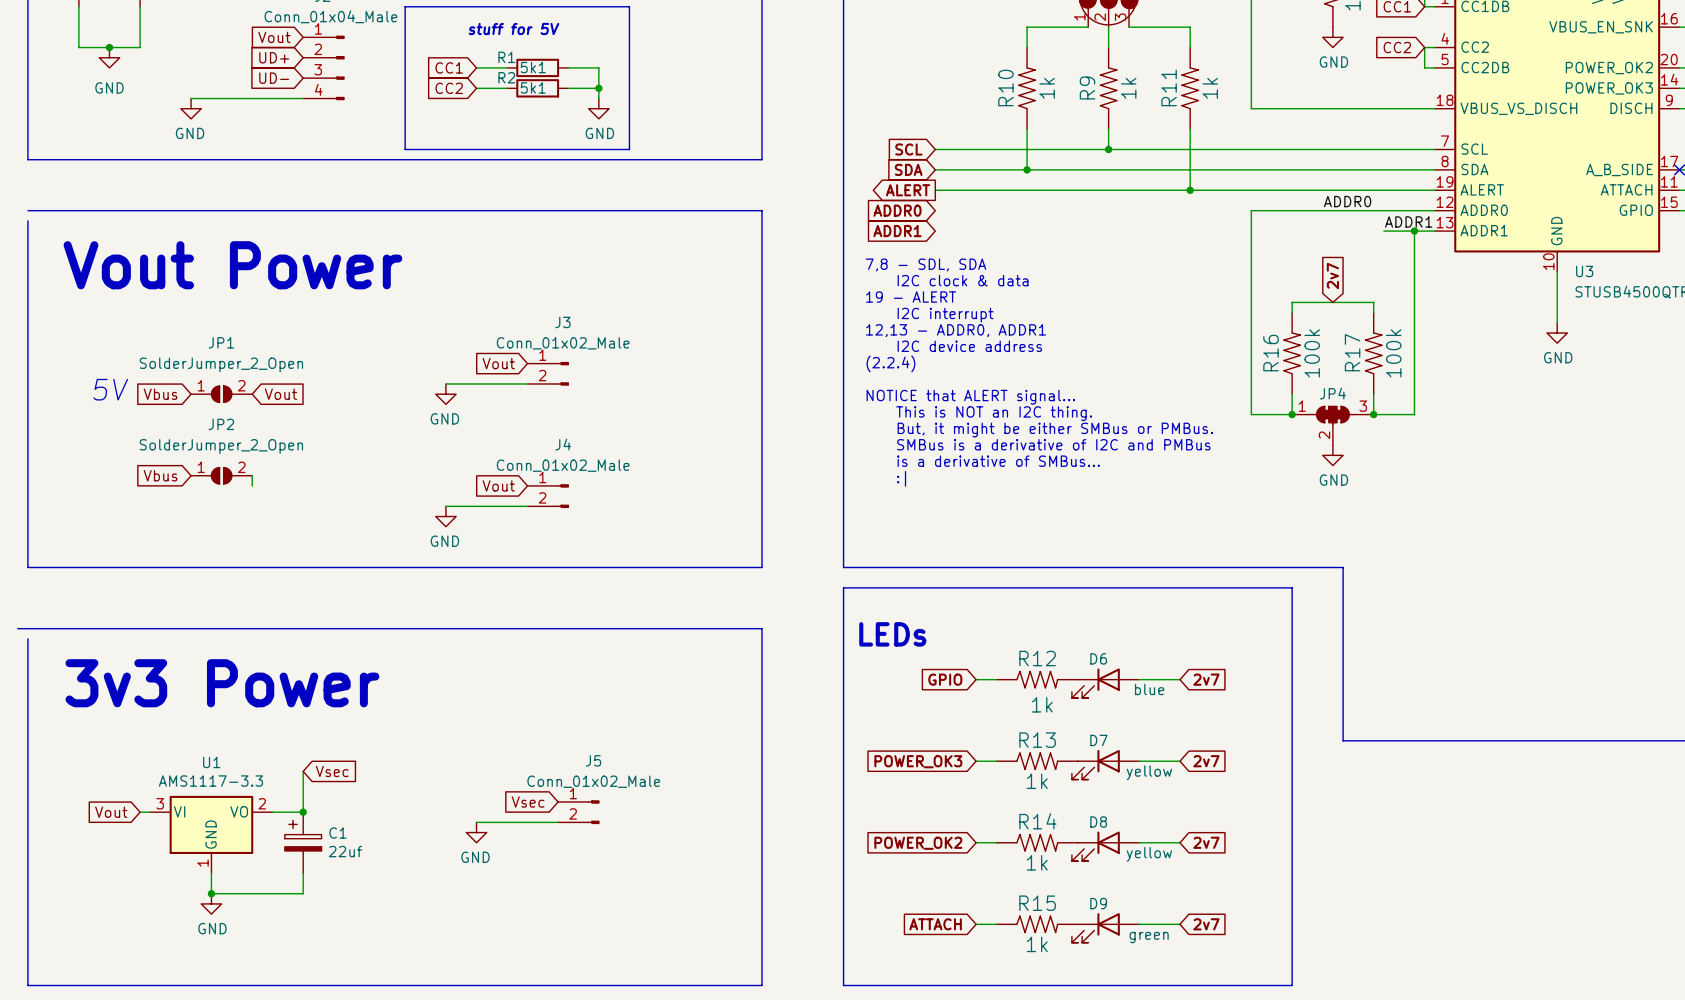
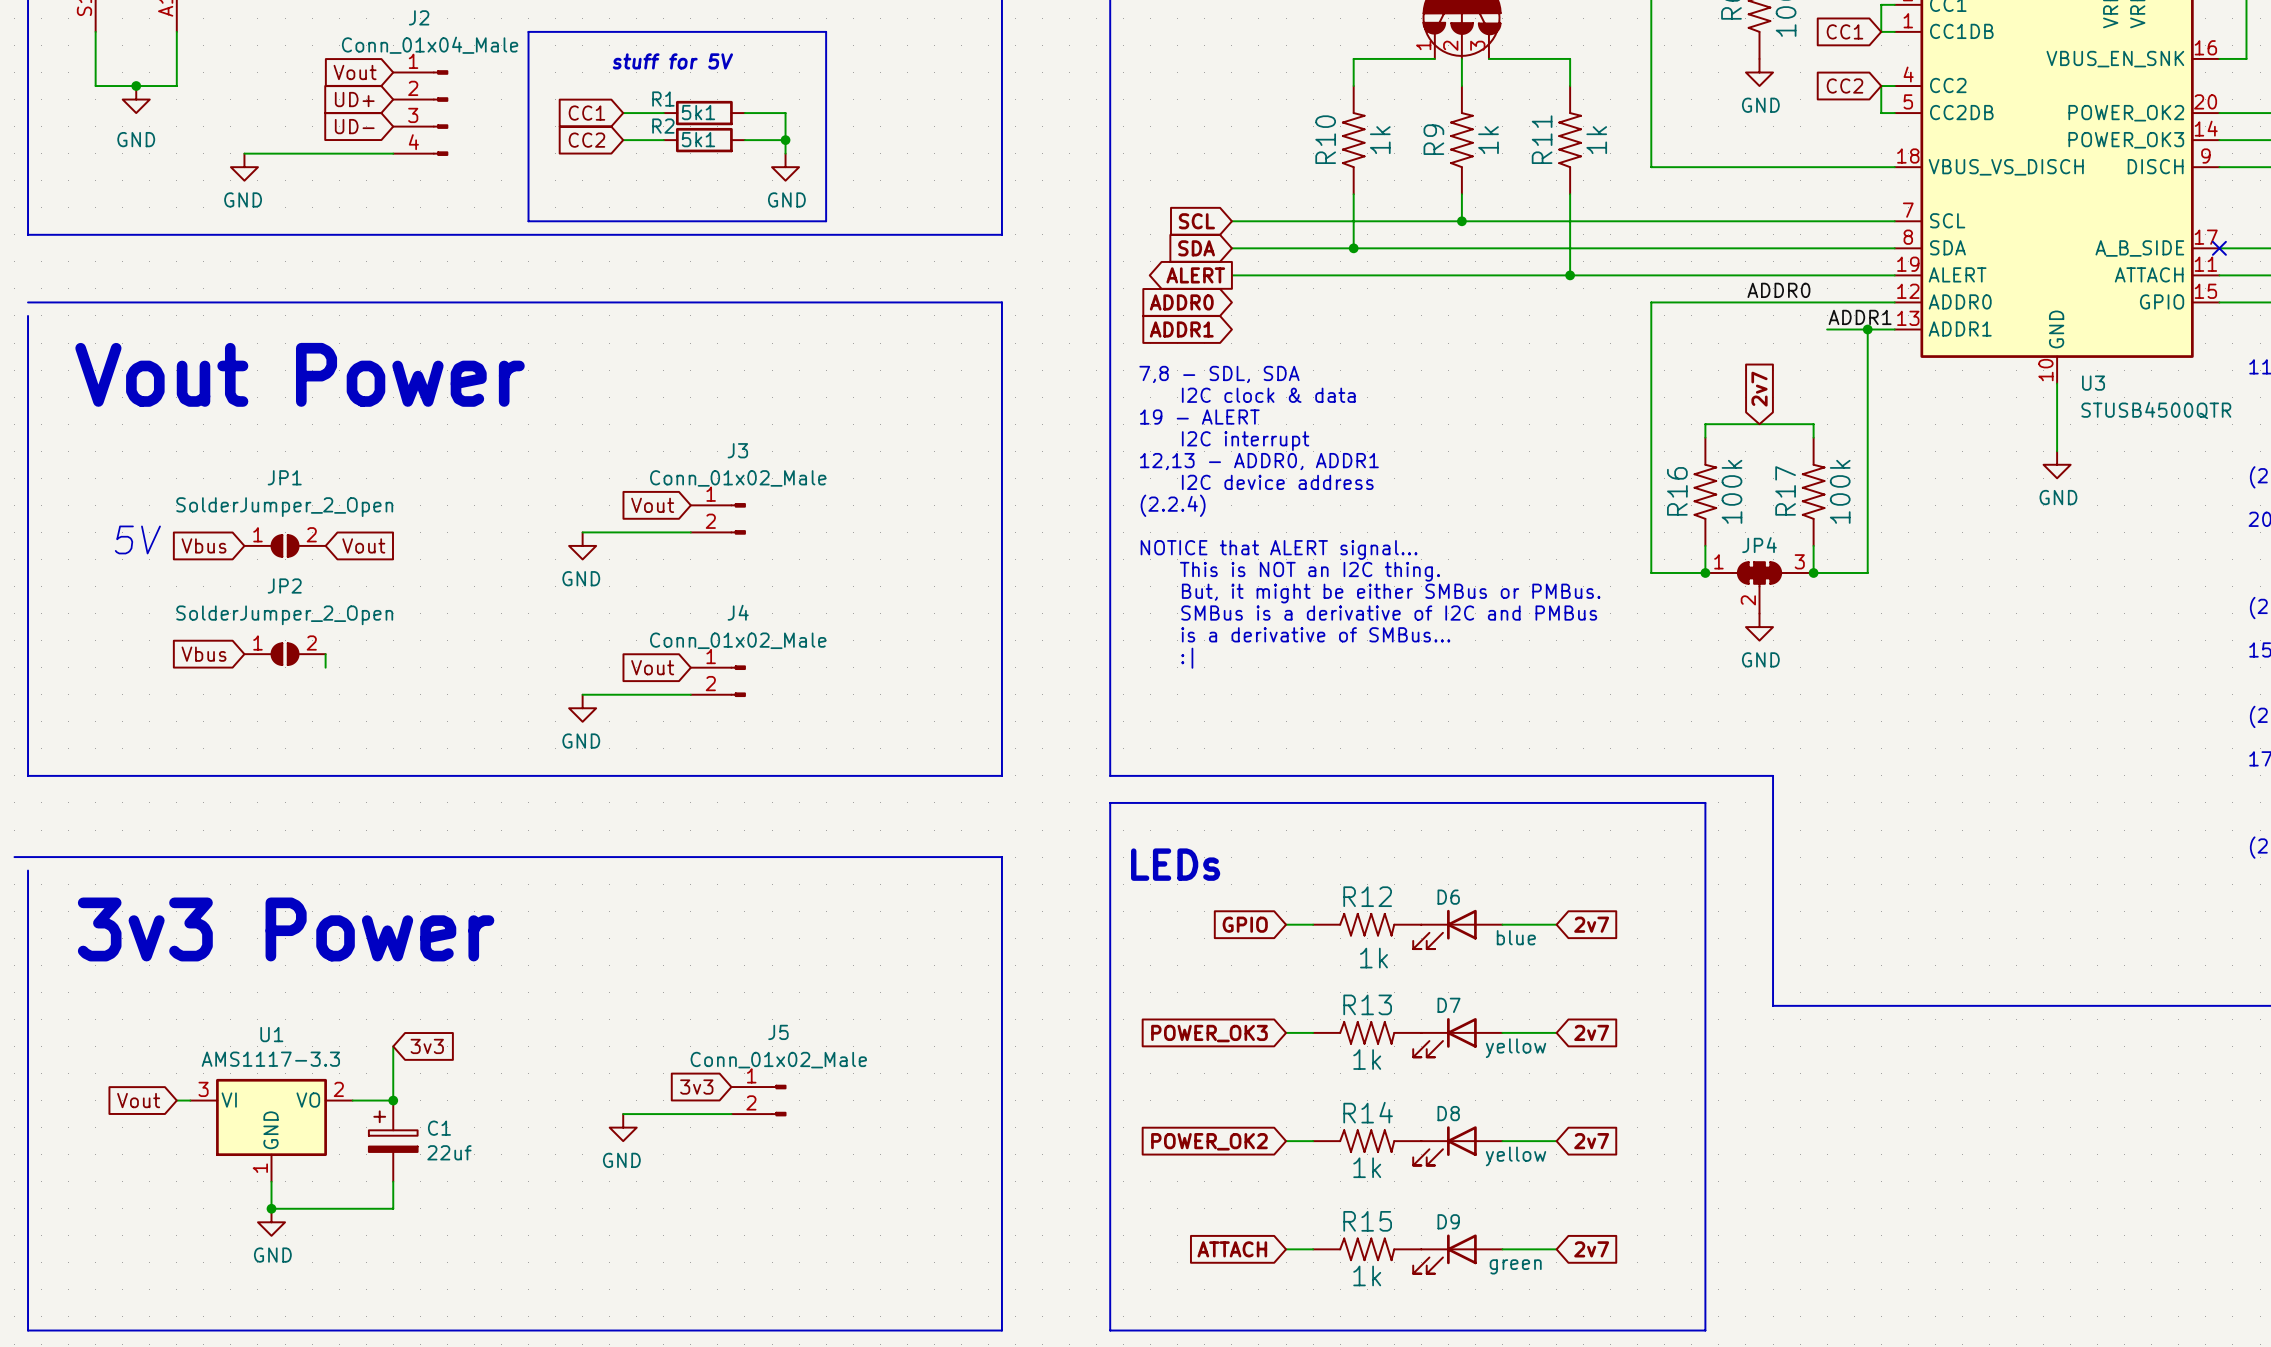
global label: Vsec (332, 771) -> 3v3 (427, 1046)
global label: Vsec (528, 801) -> 3v3 (696, 1087)

